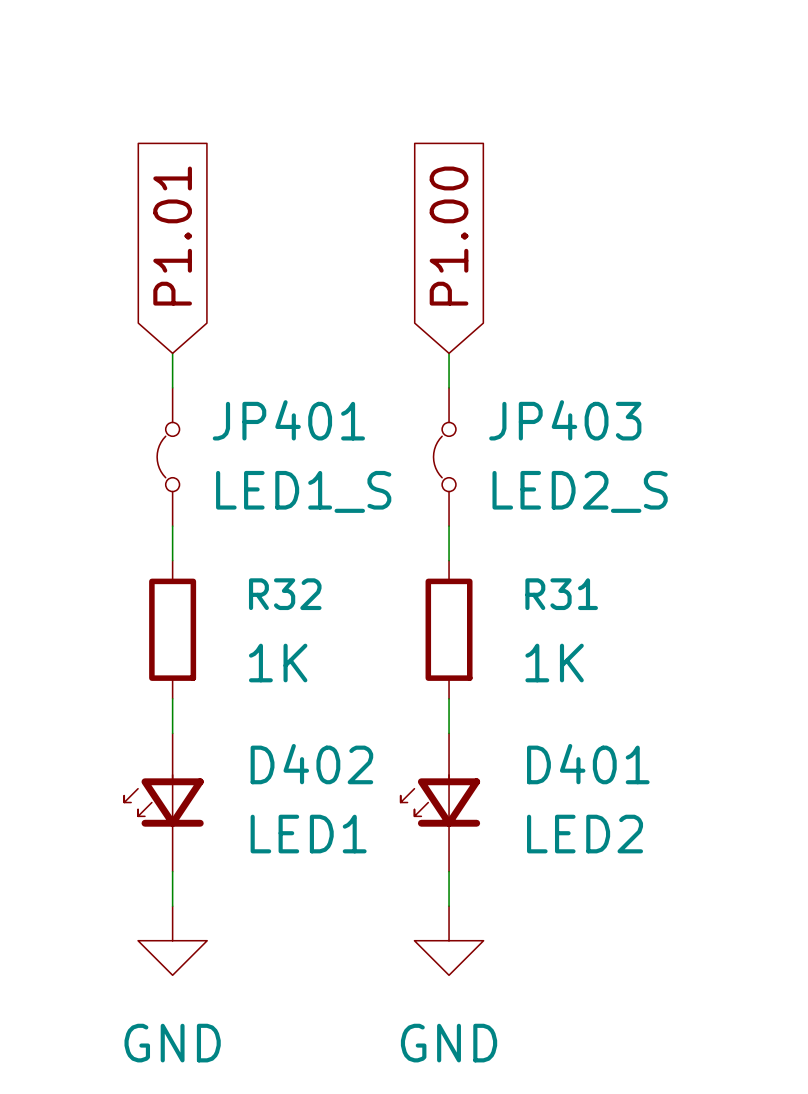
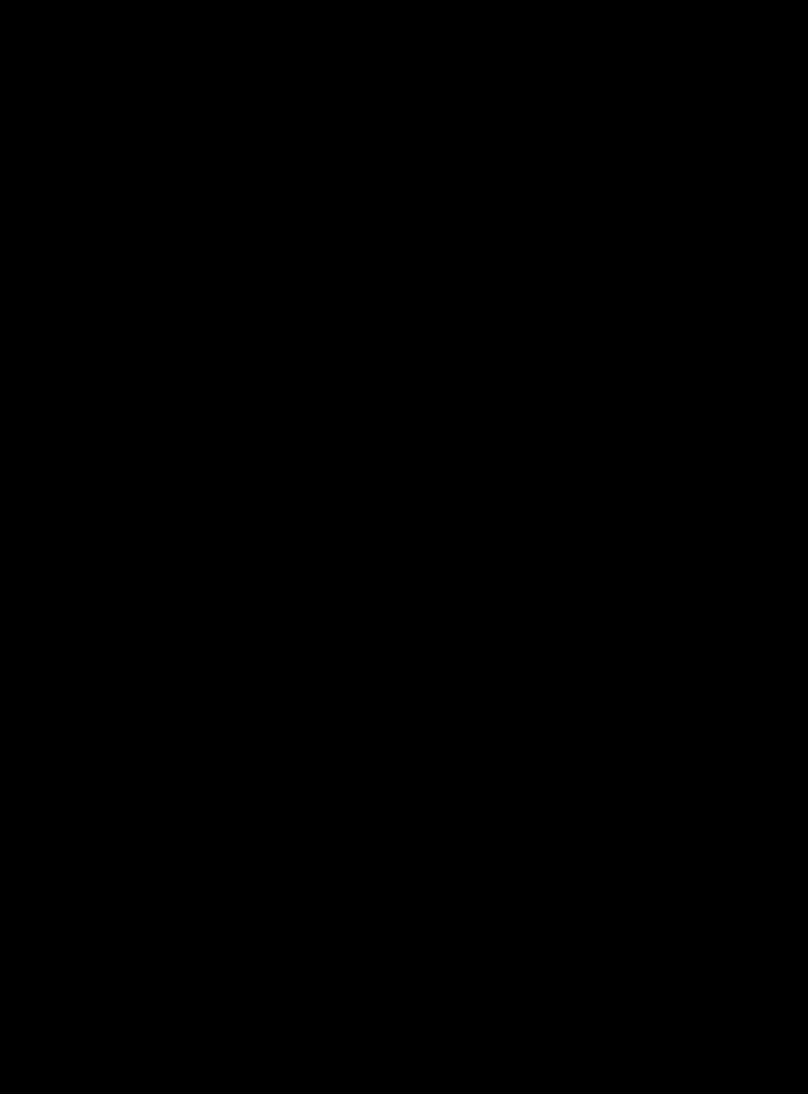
global label: P1.01 (172, 236) -> none
global label: P1.00 (449, 236) -> none
wire: (172, 353) (172, 387) -> none
wire: (449, 353) (449, 387) -> none
JP401: LED1_S (168, 457) -> none
JP403: LED2_S (444, 457) -> none
wire: (172, 526) (172, 560) -> none
wire: (449, 526) (449, 560) -> none
R32: 1K (172, 629) -> none
R31: 1K (449, 629) -> none
wire: (172, 698) (172, 733) -> none
wire: (449, 698) (449, 733) -> none
D402: LED1 (163, 802) -> none
D401: LED2 (440, 802) -> none
wire: (172, 871) (172, 906) -> none
wire: (449, 871) (449, 906) -> none
power symbol: GND (172, 940) -> none
power symbol: GND (449, 940) -> none

